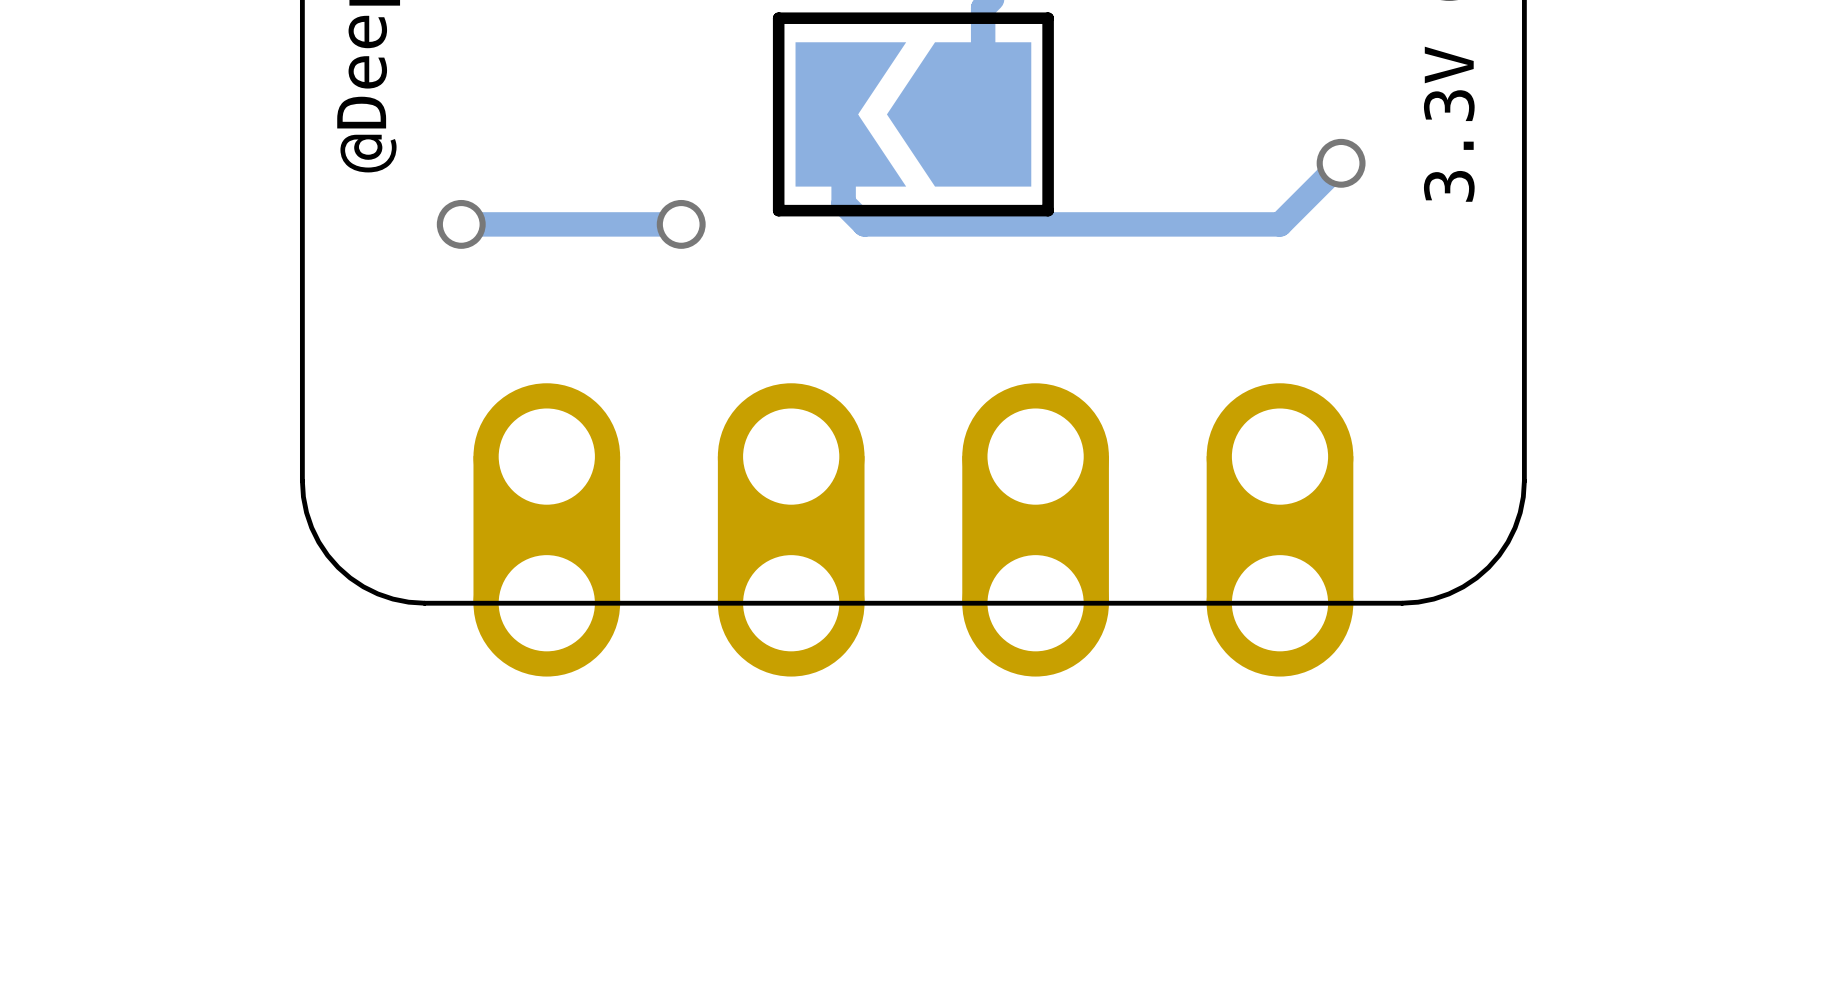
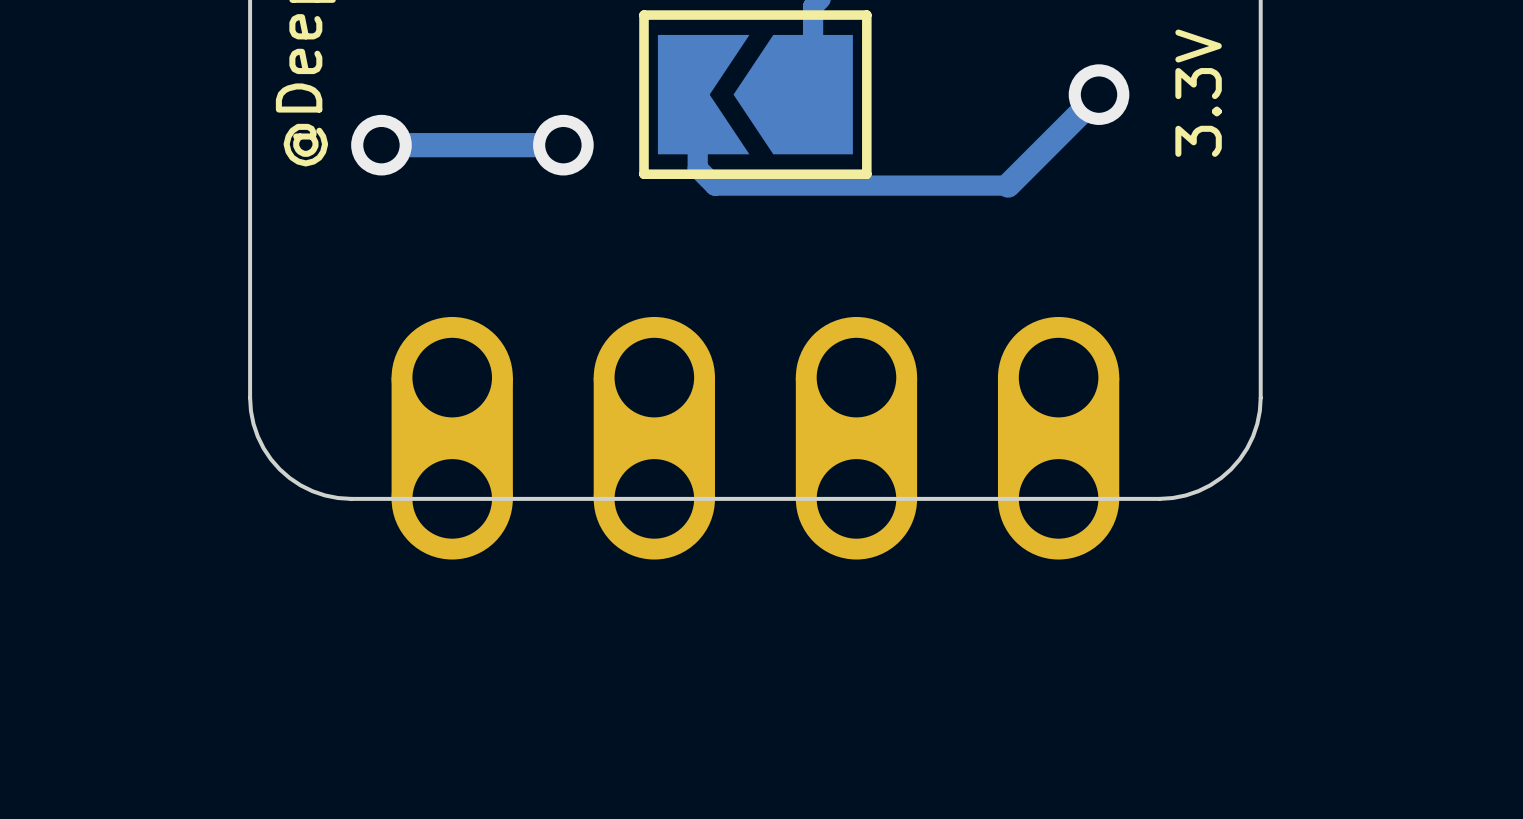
track: (1341, 163) (1279, 224) (1218, 224) -> (1099, 94) (1008, 185)
via position: (1341, 163) -> (1099, 94)
via size: [436, 199, 486, 249] -> [351, 114, 412, 176]
via size: [656, 199, 706, 249] -> [533, 114, 594, 176]
track: (681, 224) (461, 224) -> (563, 145) (381, 145)

